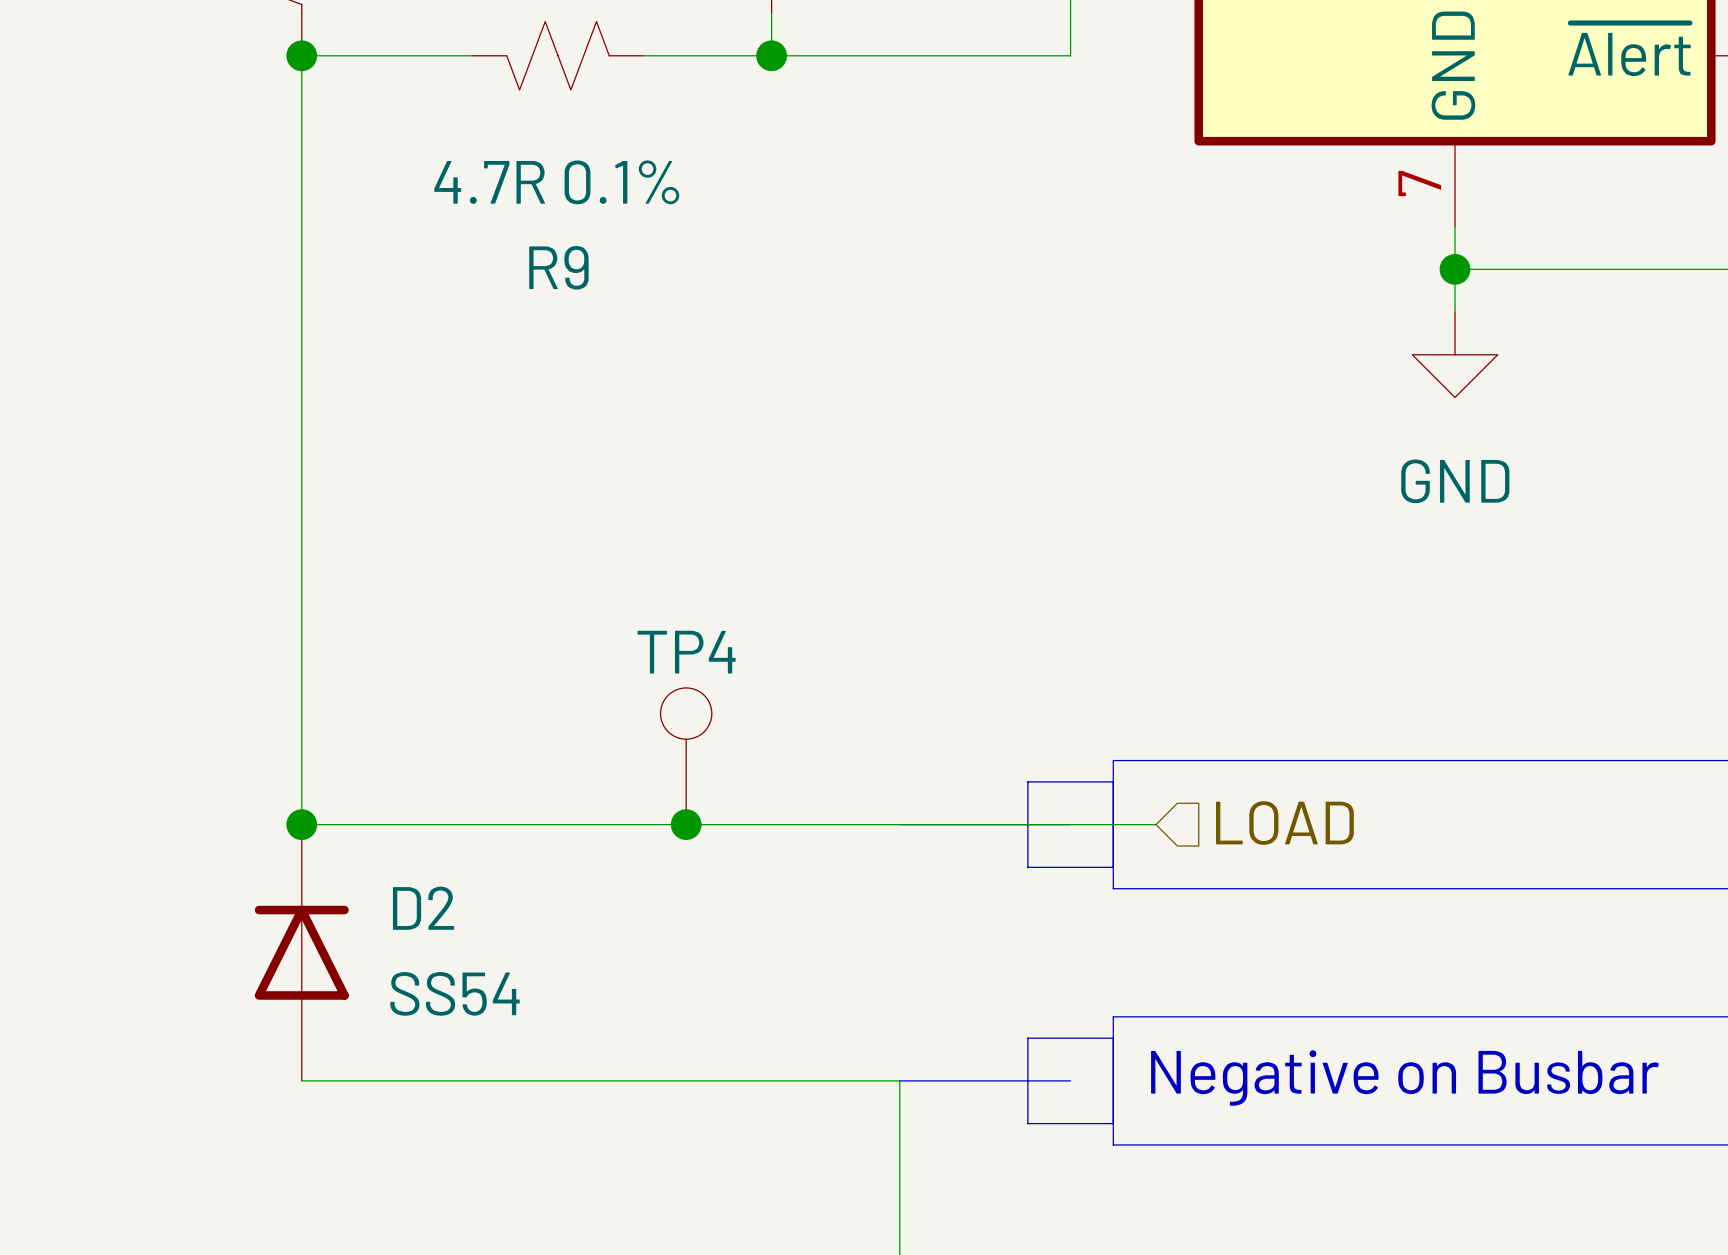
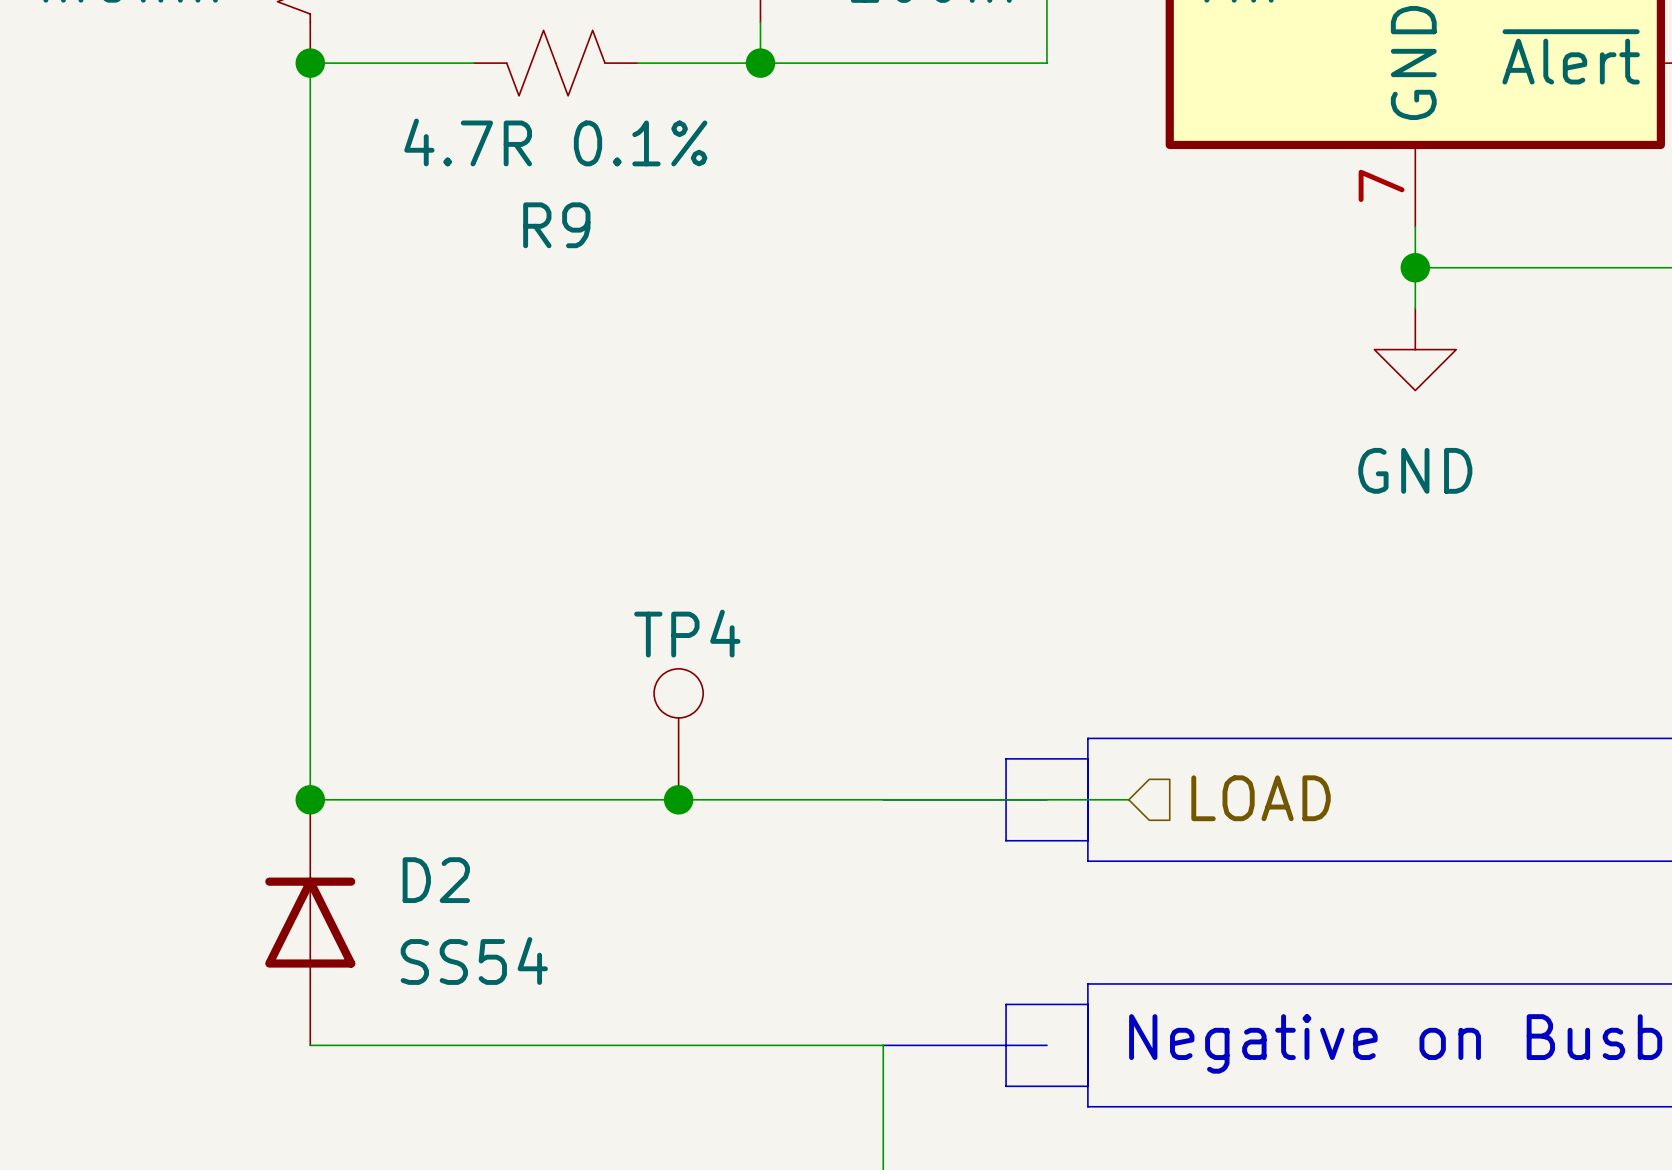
R9 value position: 4.7R 0.1% (556, 182) -> 4.7R 0.1% (555, 142)
R9 name position: R9 (558, 267) -> R9 (556, 225)

